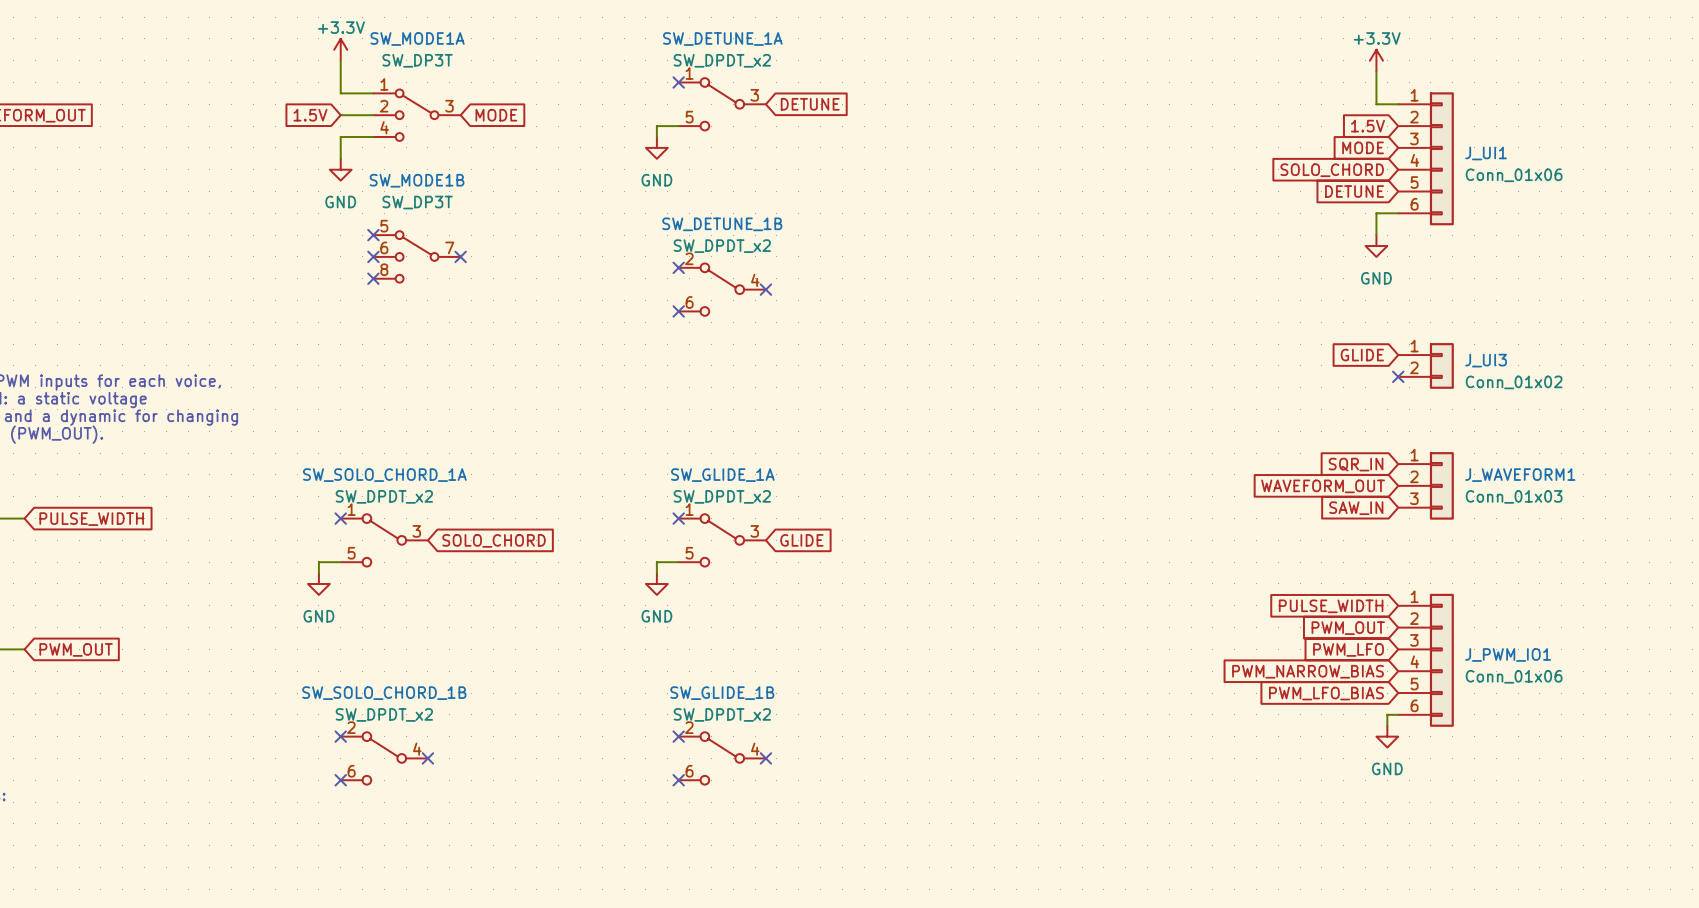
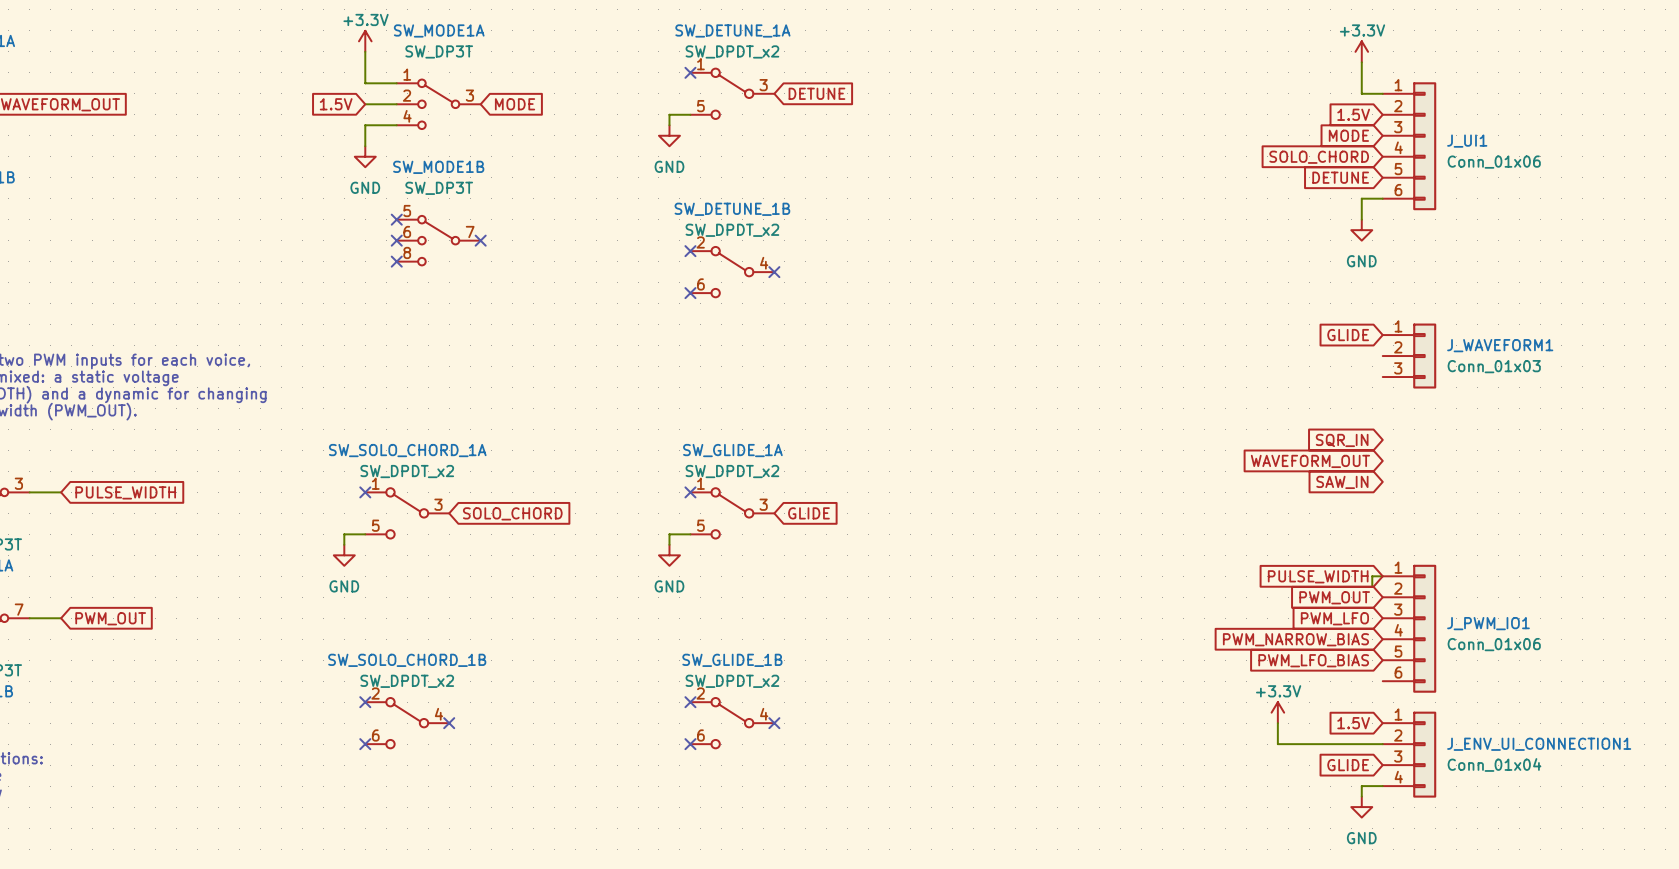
J_UI3: Conn_01x02 (1426, 365) -> none
no-connect mark: (1398, 376) -> none
J_WAVEFORM1 position: (1426, 485) -> (1409, 356)
wire: (1398, 714) (1387, 714) (1387, 725) -> (1382, 576) (1372, 576) (1372, 586)
power symbol position: GND (1387, 736) -> GND (1361, 807)
power symbol: none -> +3.3V (1277, 712)
wire: none -> (1277, 723) (1277, 744) (1382, 744)
global label: none -> 1.5V (1353, 723)
J_ENV_UI_CONNECTION1: none -> Conn_01x04 (1409, 754)
global label: none -> GLIDE (1348, 765)
wire: none -> (1382, 786) (1361, 786) (1361, 796)

